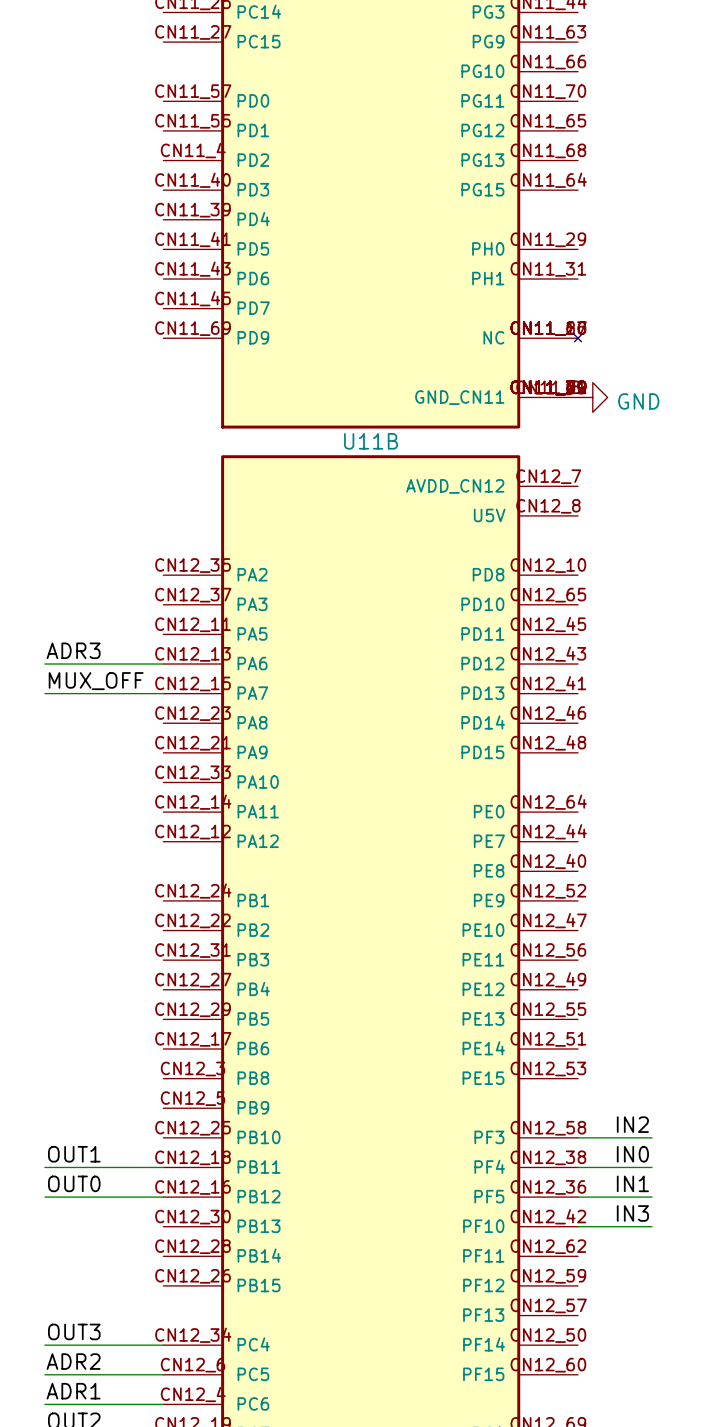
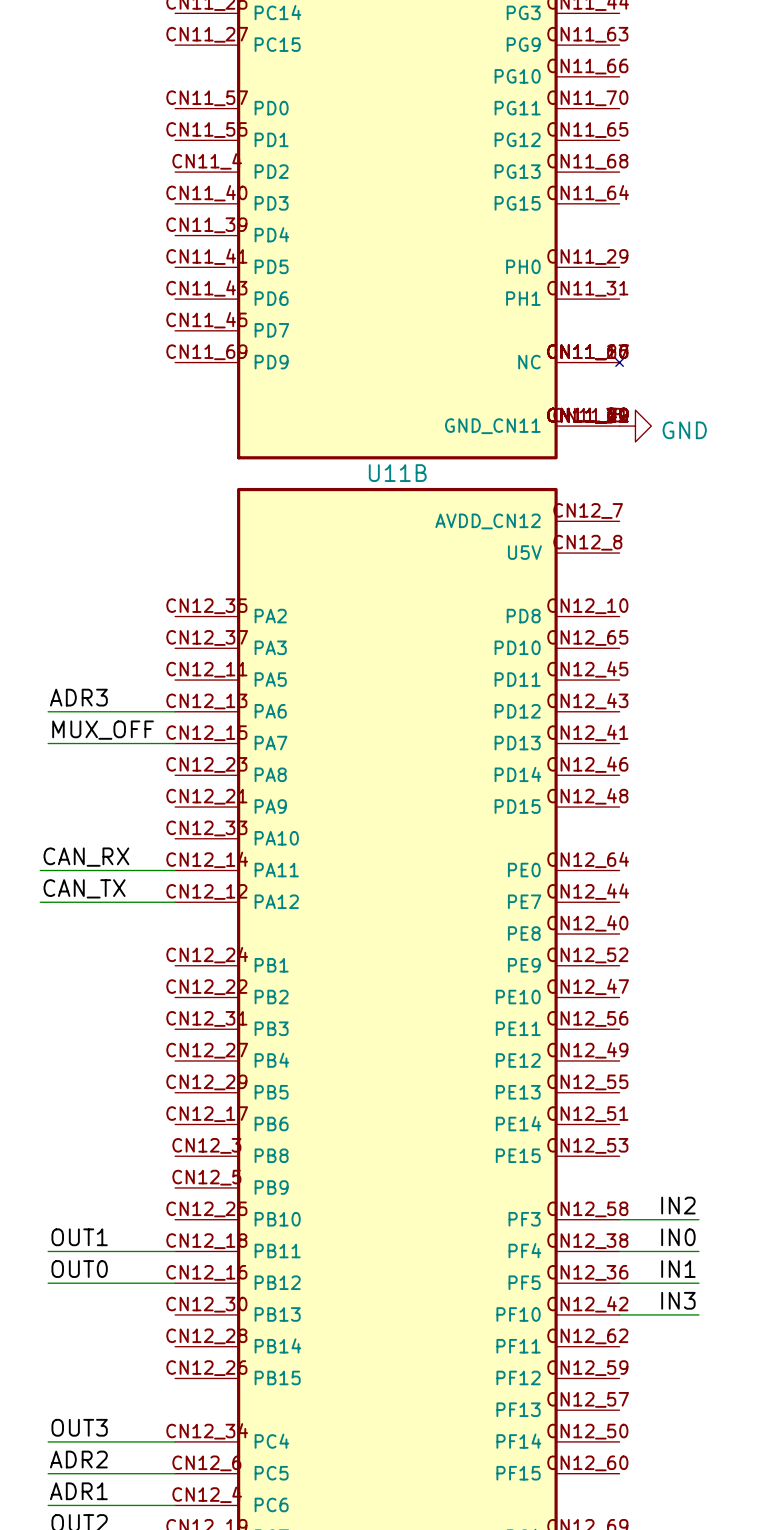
label: none -> CAN_RX (86, 857)
wire: none -> (40, 870) (175, 870)
label: none -> CAN_TX (84, 888)
wire: none -> (40, 902) (175, 902)

